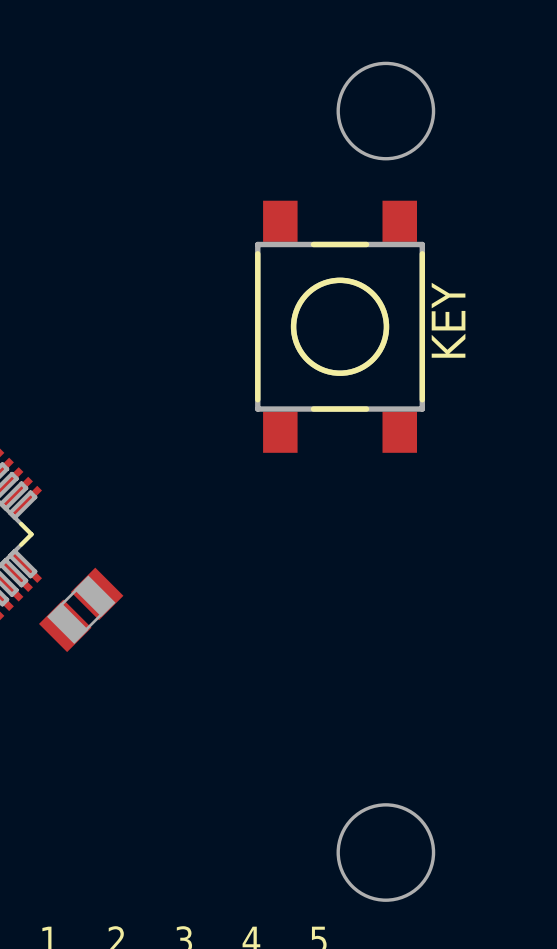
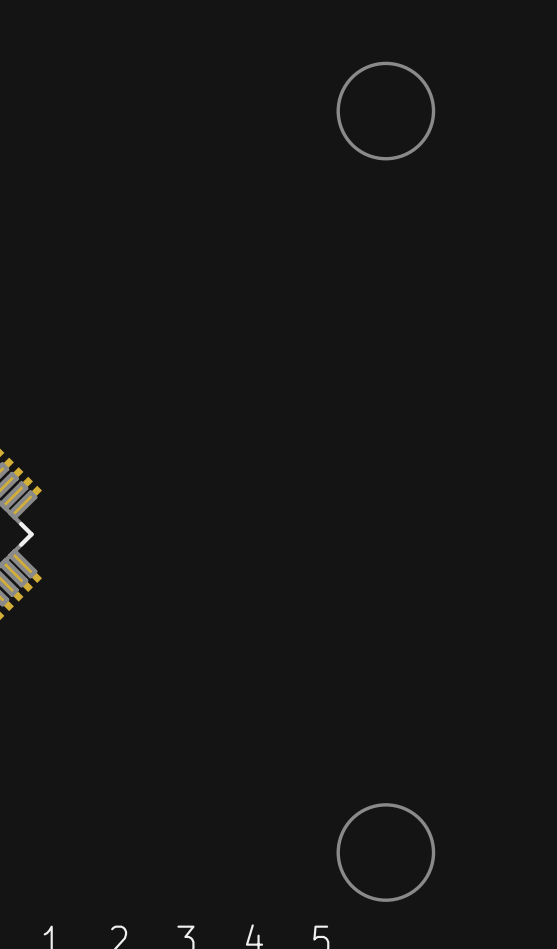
KEY: (340, 326) -> none
part: (81, 609) -> none

